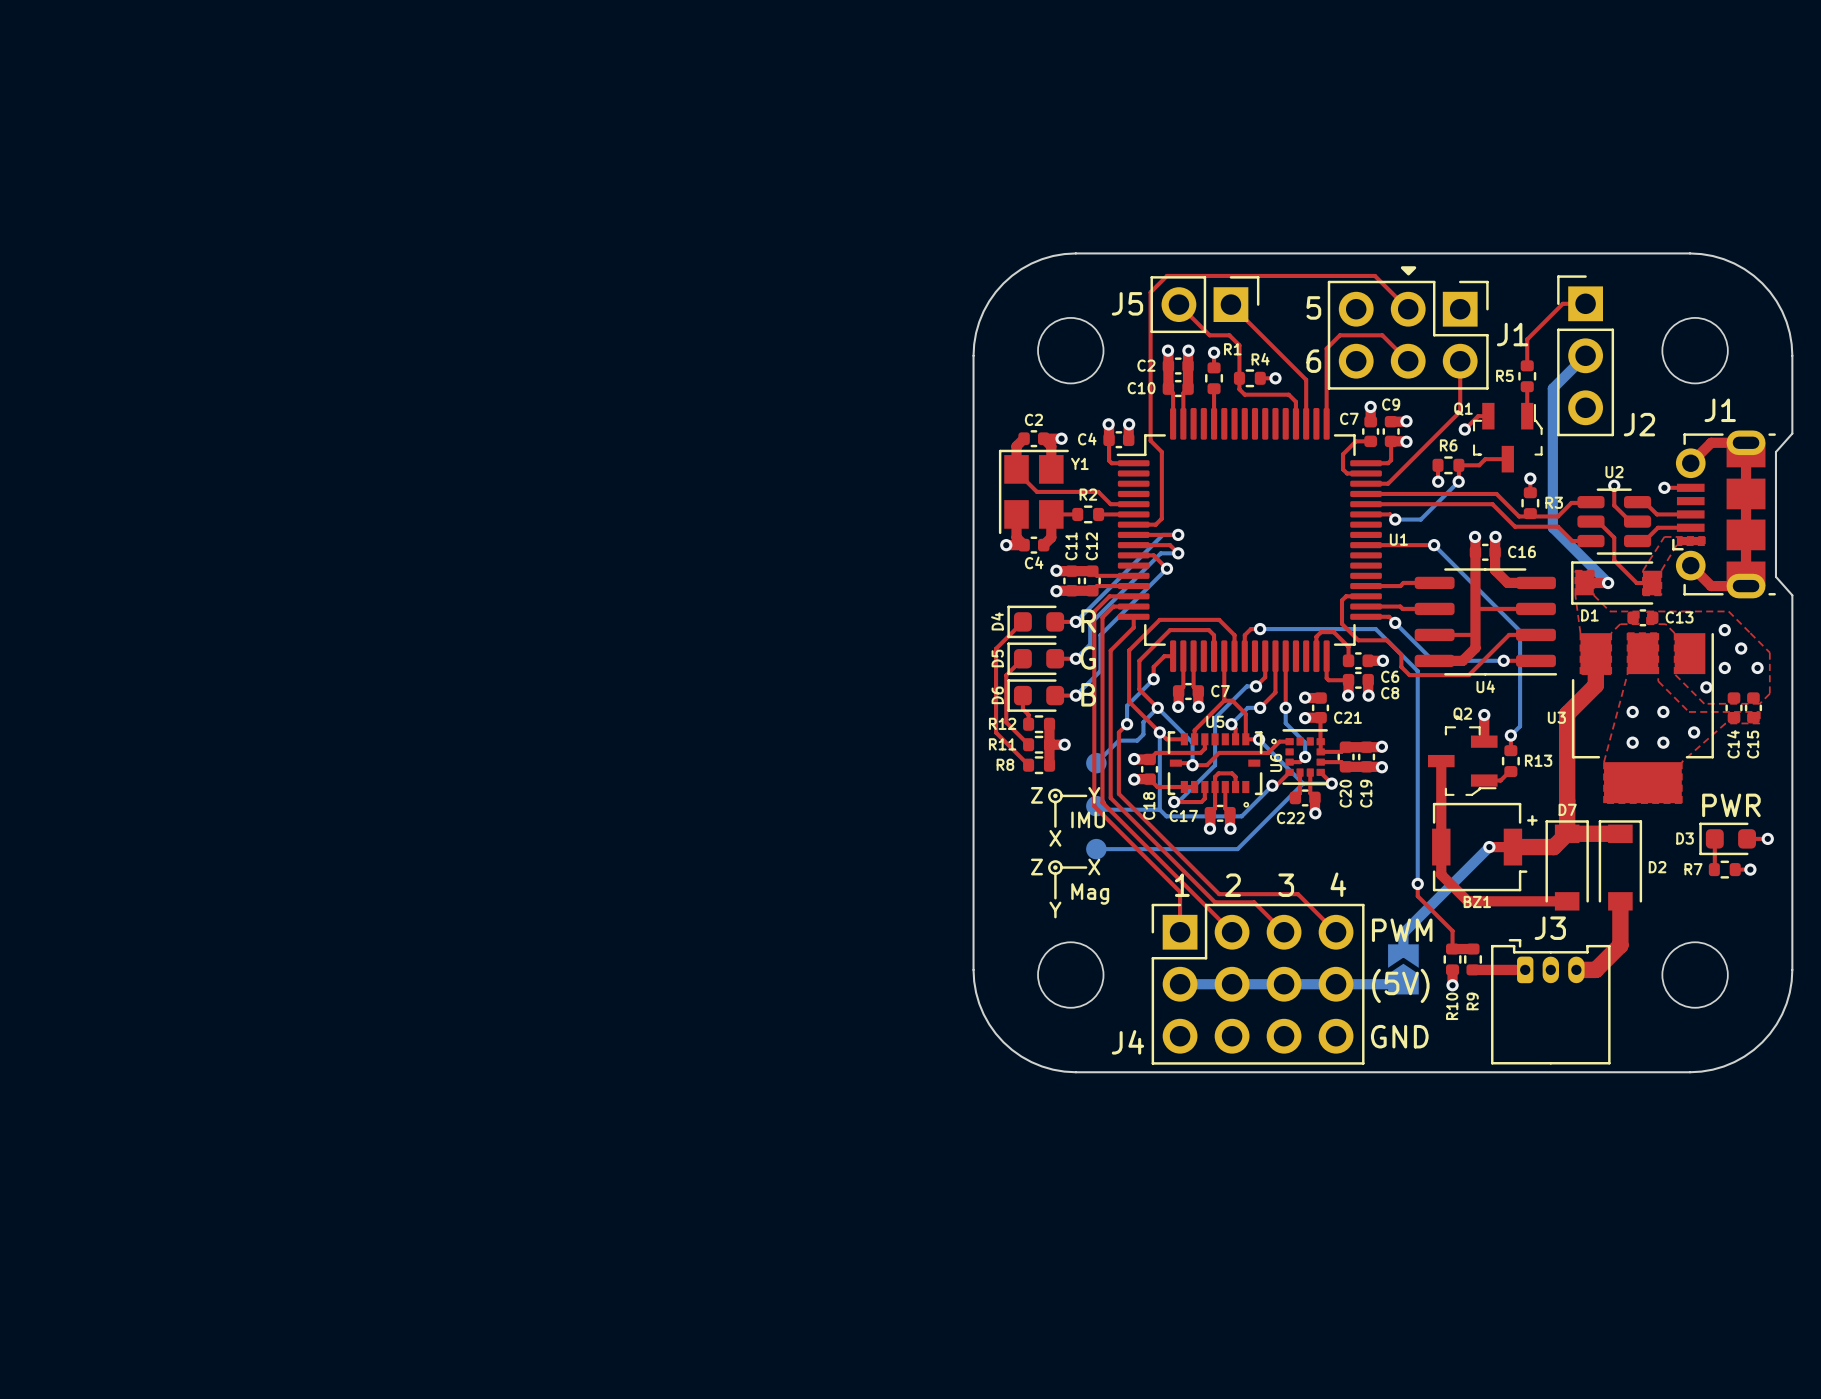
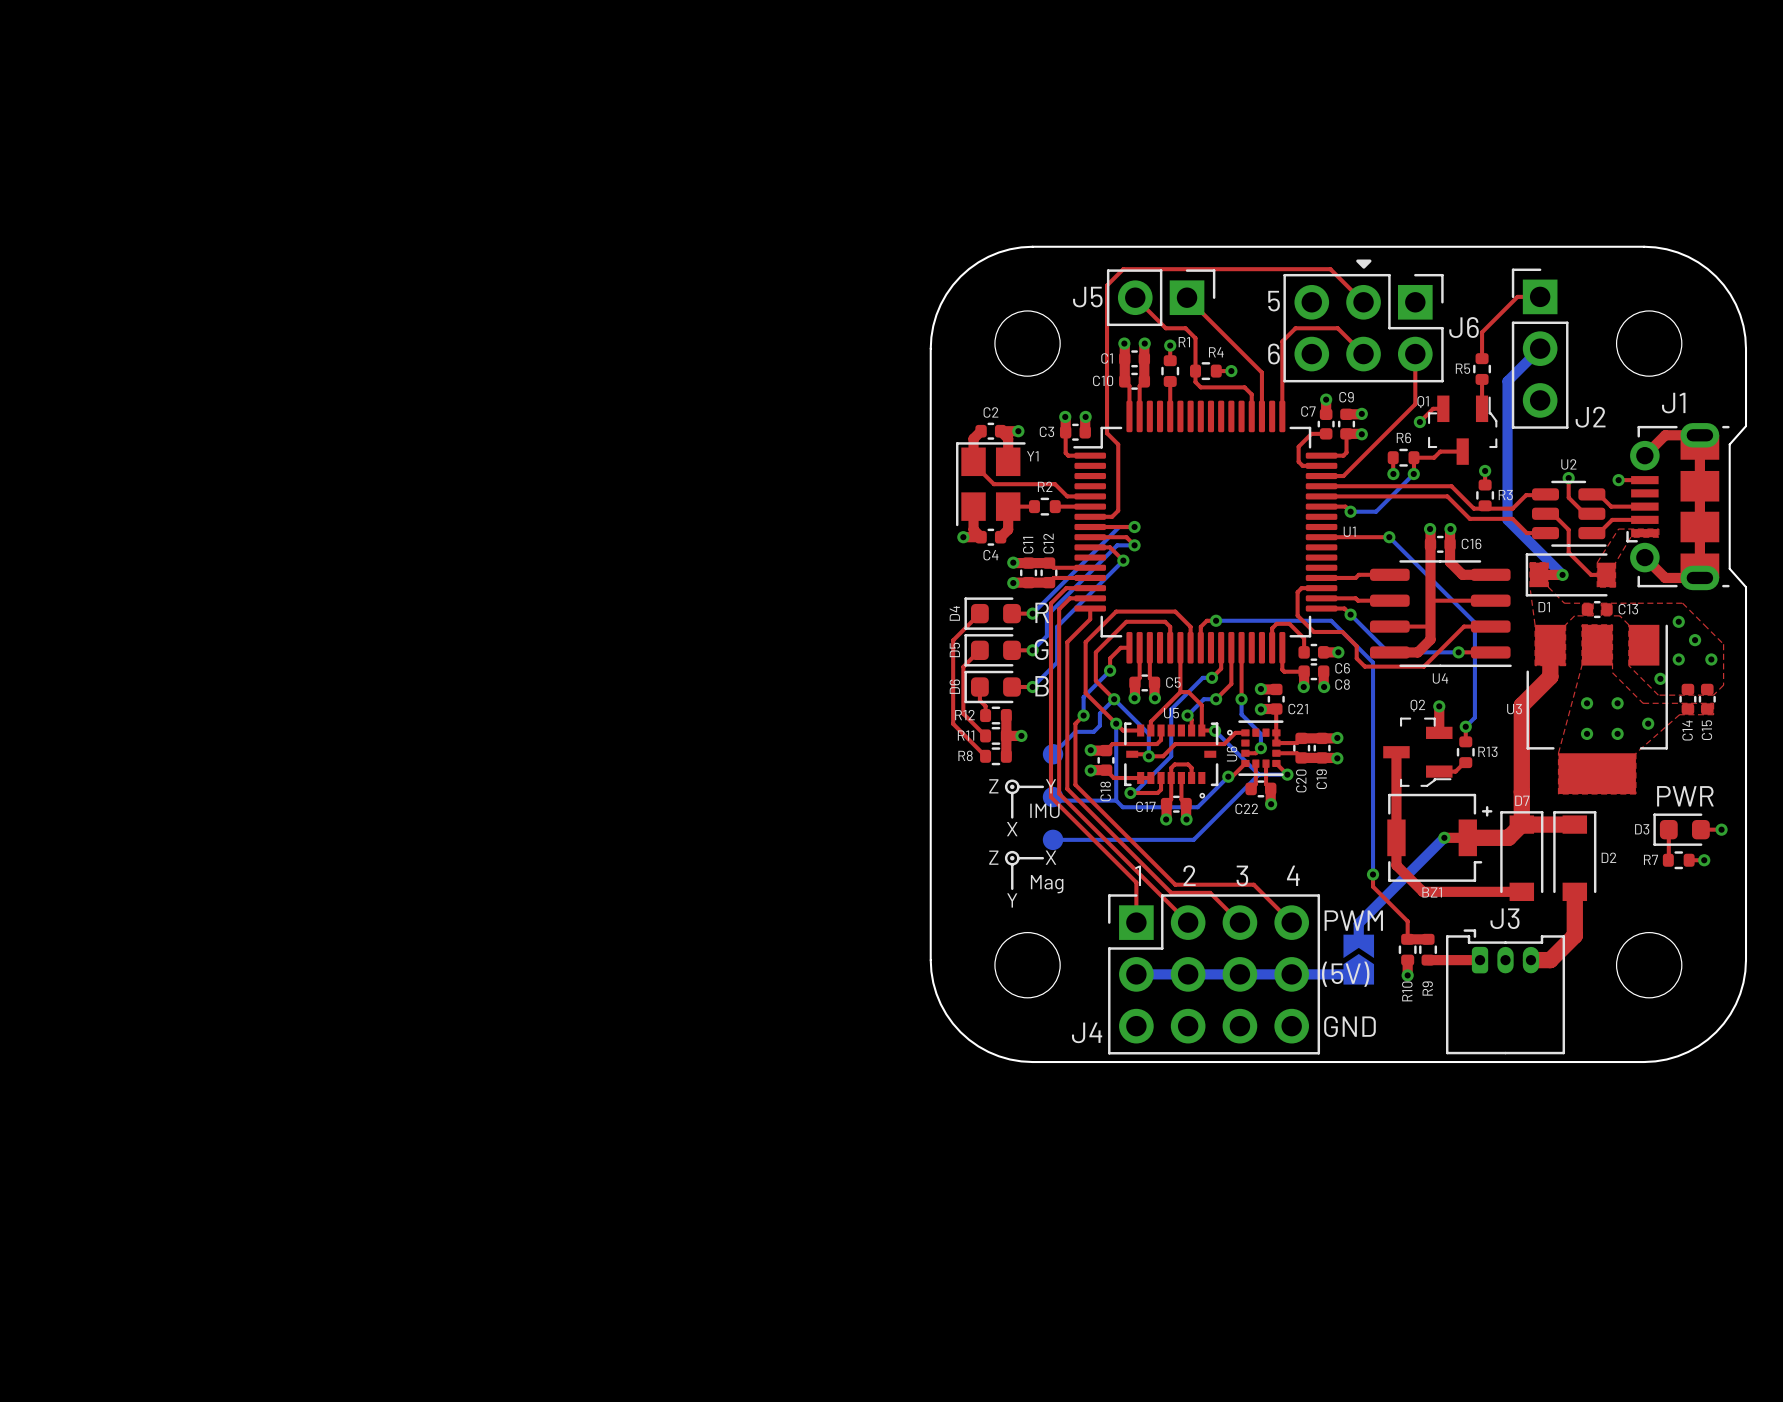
J1 name: J1 (1512, 334) -> J6 (1464, 327)
C2 name: C2 (1146, 365) -> C1 (1107, 358)
C4 name: C4 (1087, 439) -> C3 (1046, 431)
C7 name: C7 (1220, 691) -> C5 (1173, 682)

